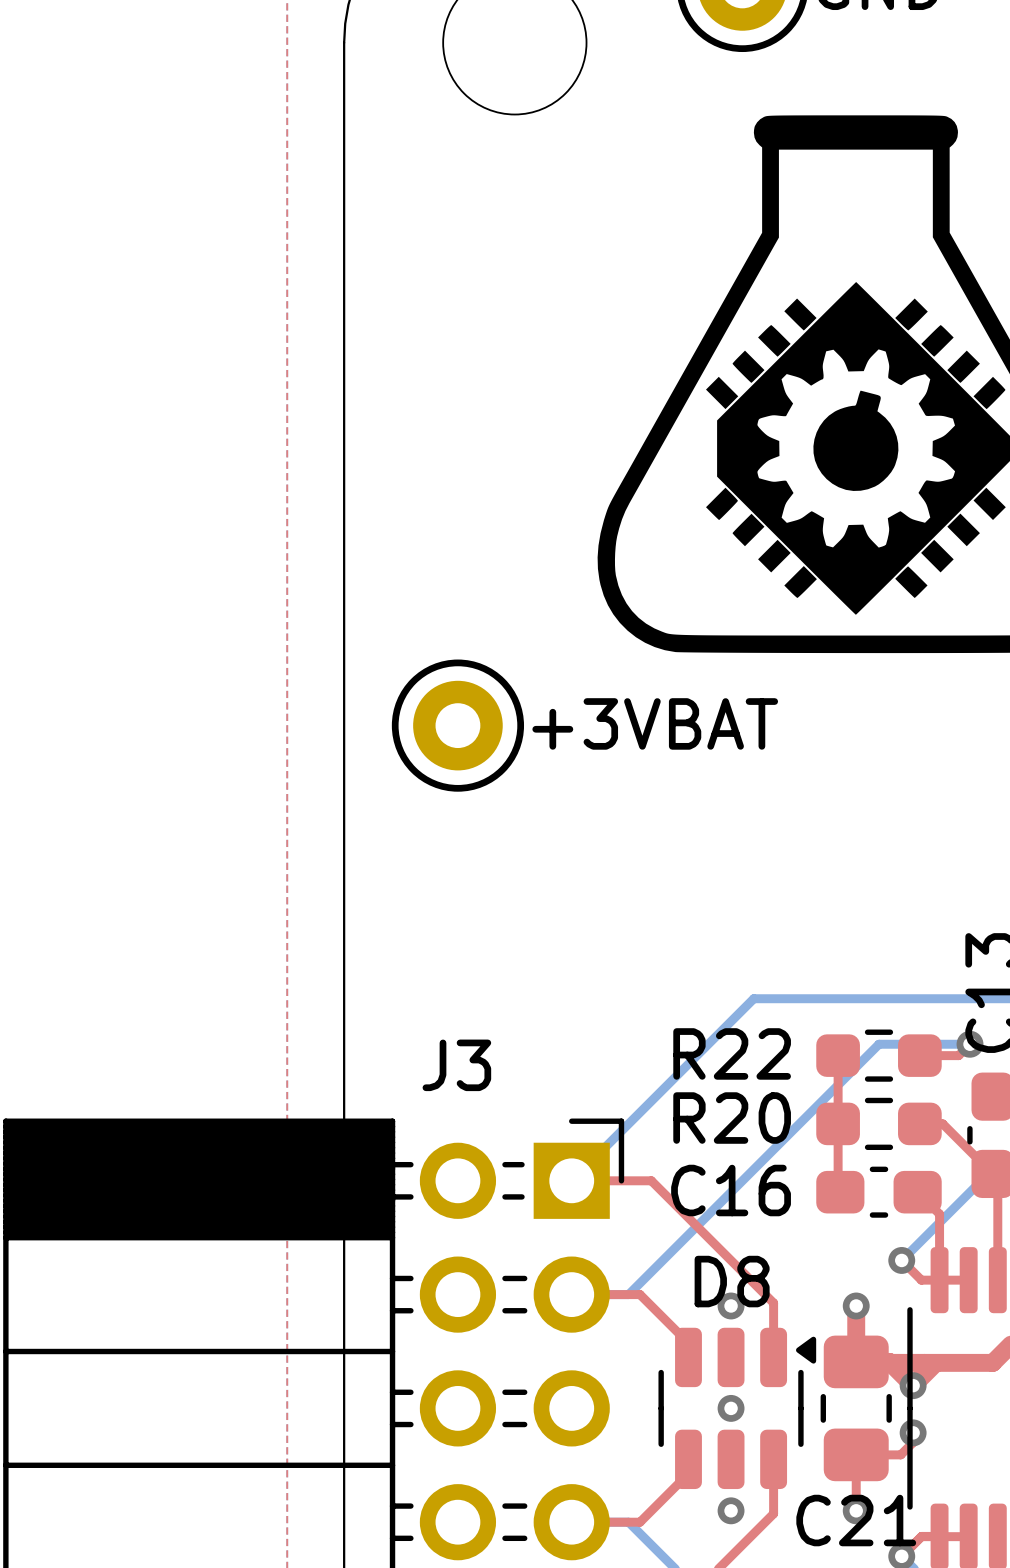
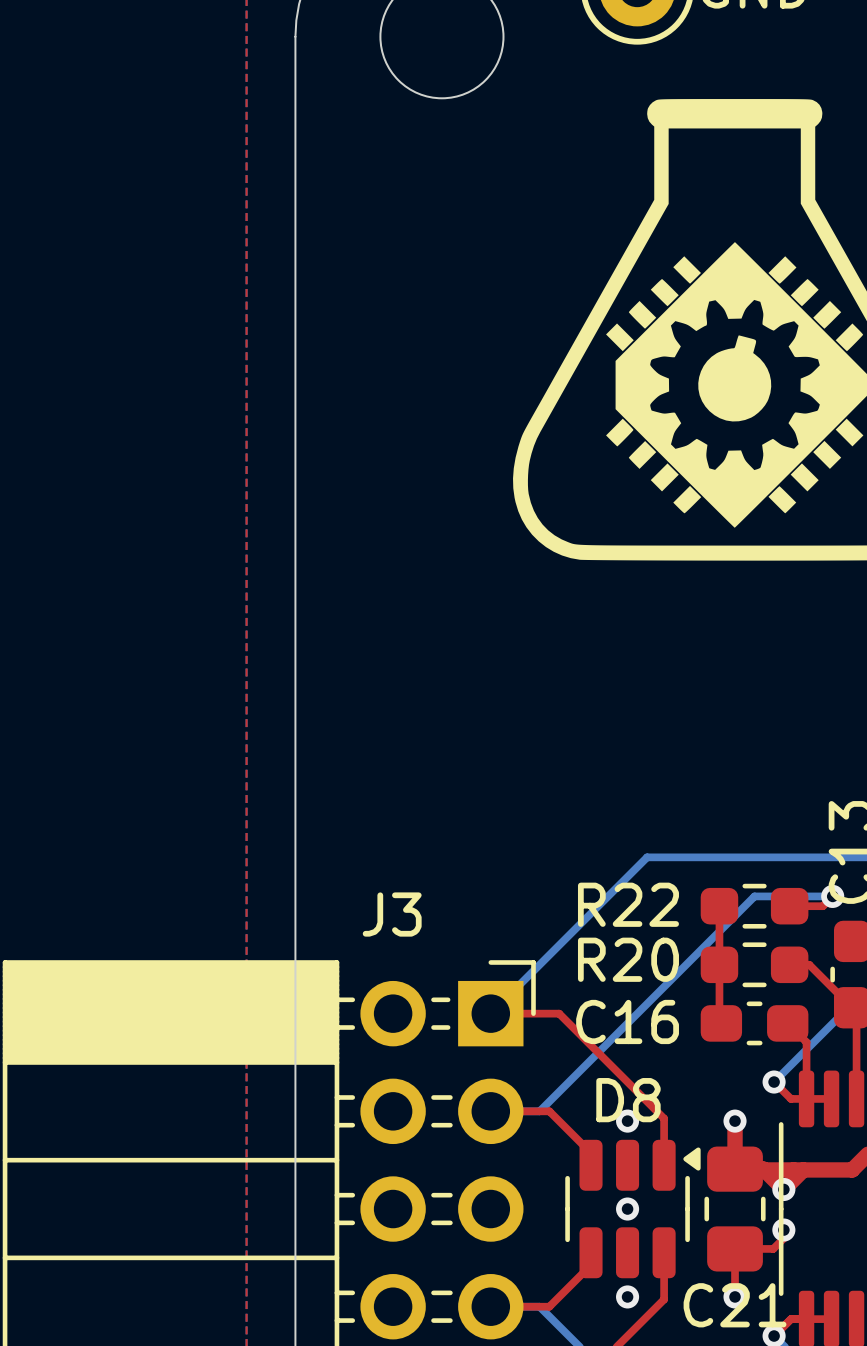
part: +3VBAT (457, 725) -> none

